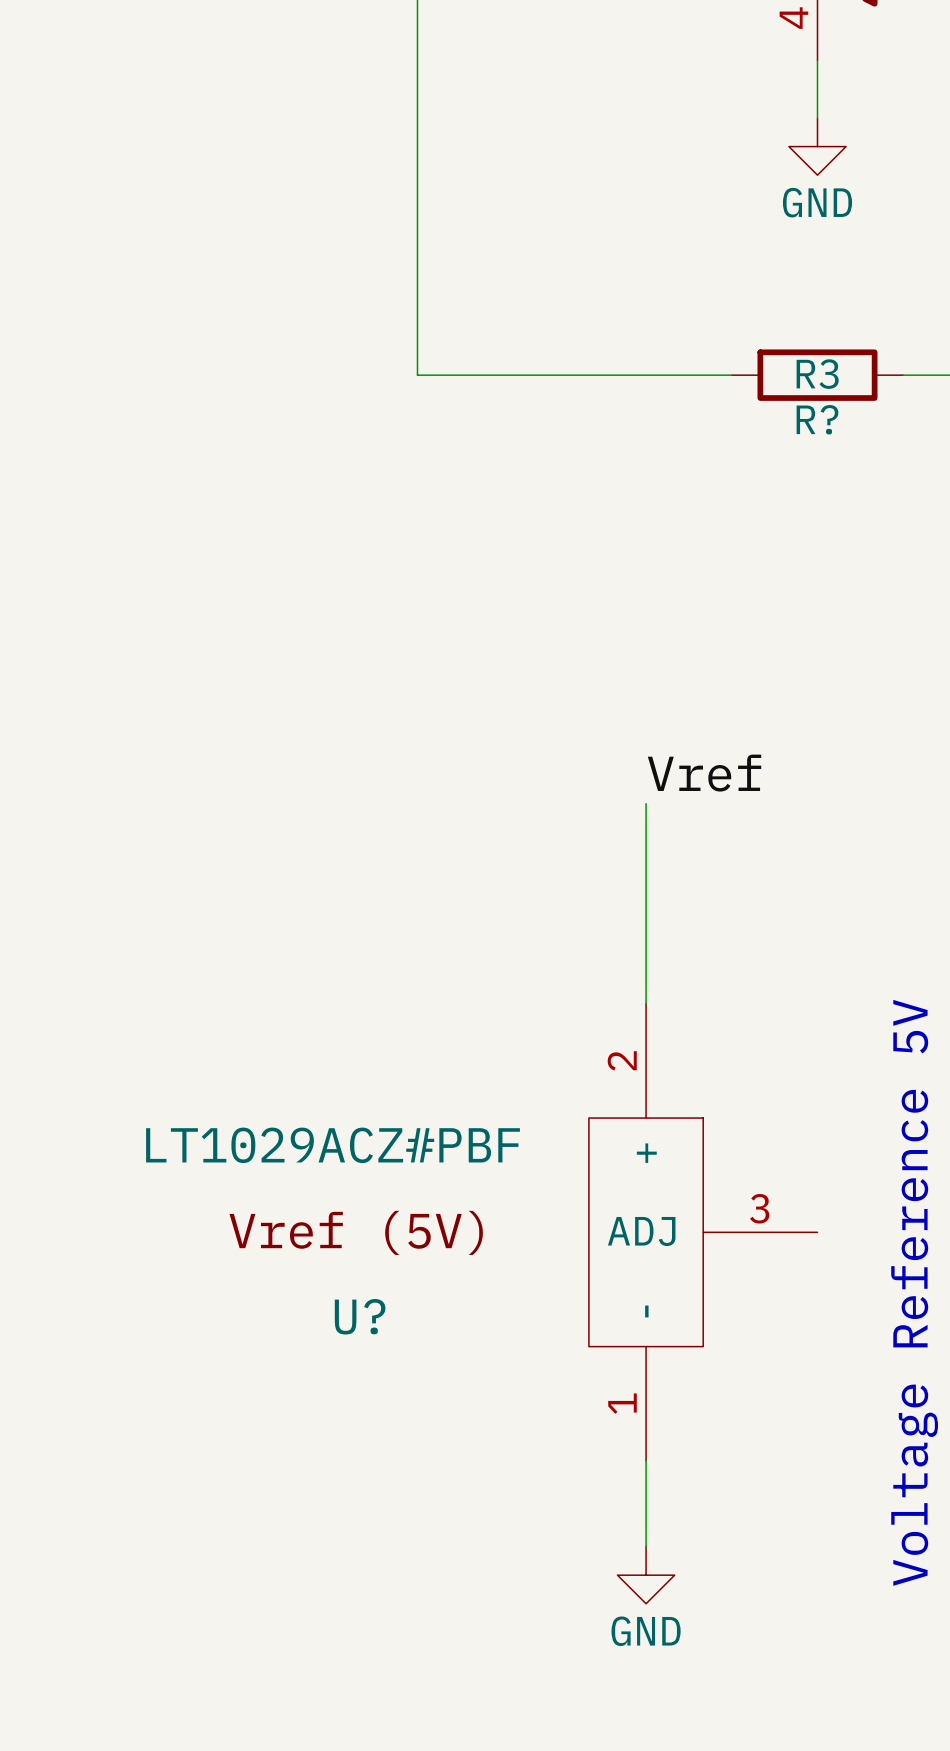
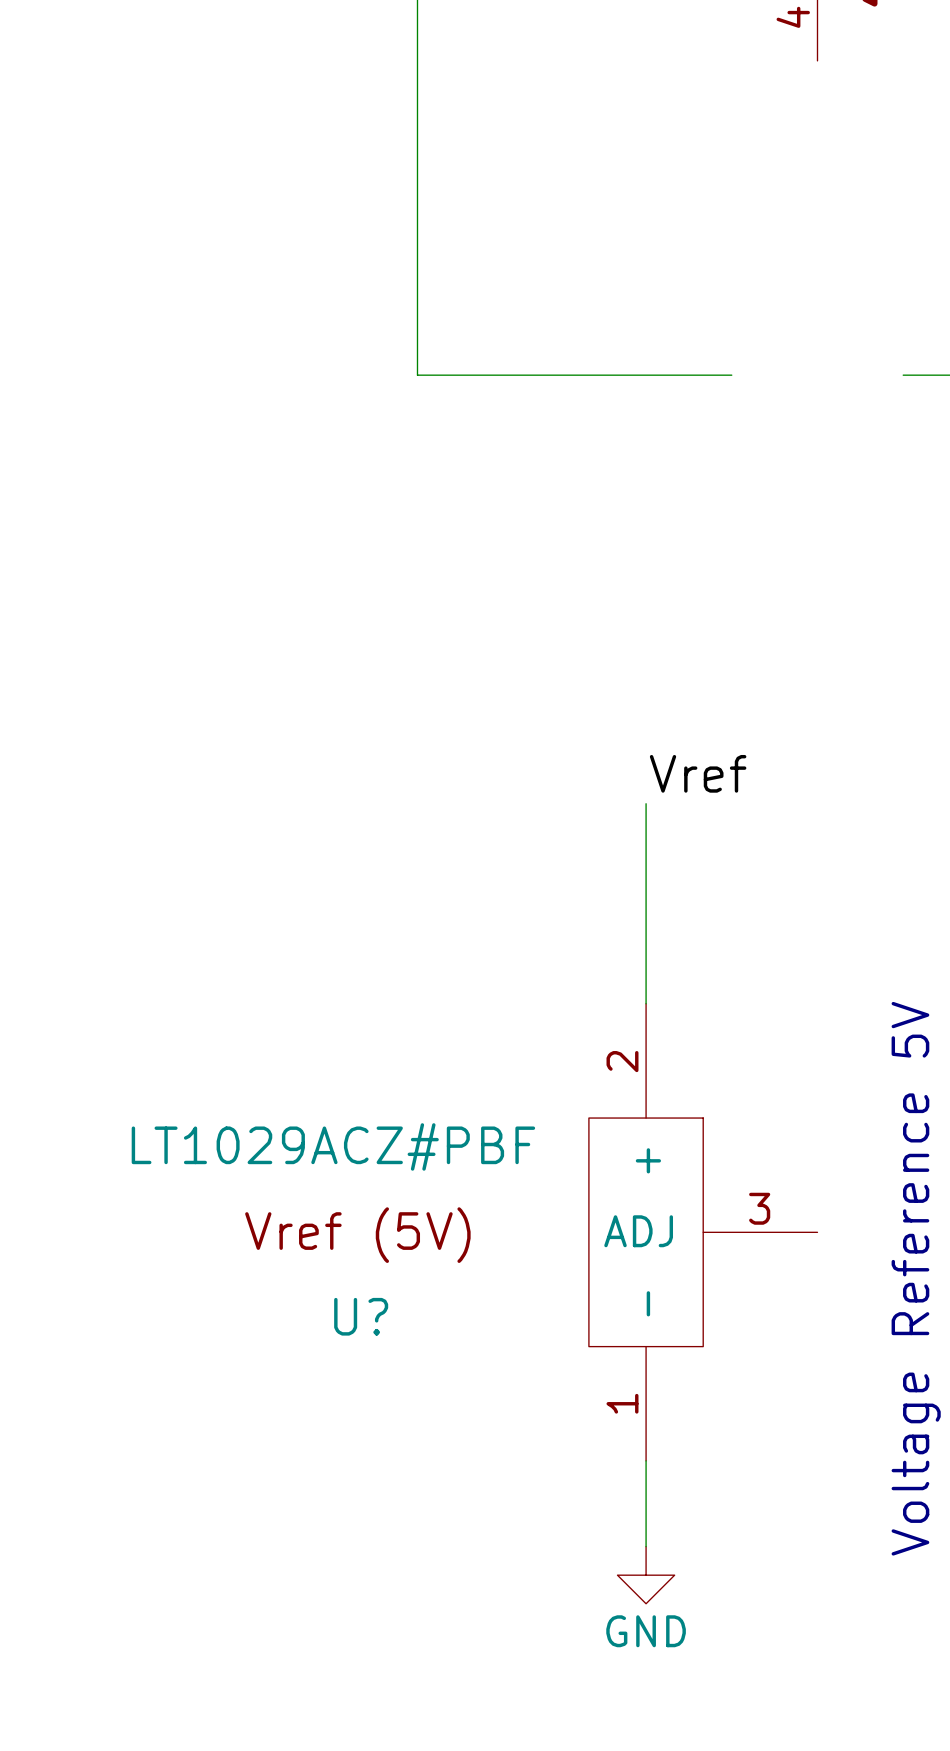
wire: (817, 60) (817, 118) -> none
power symbol: GND (817, 146) -> none
R?: R3 (817, 375) -> none

